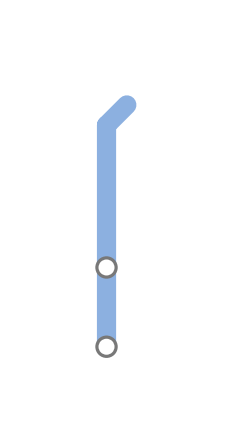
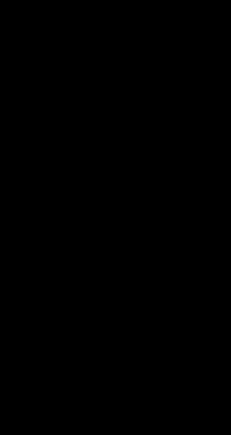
track: (126, 104) (106, 125) (106, 346) -> none
via: (106, 267) -> none
via: (106, 346) -> none

